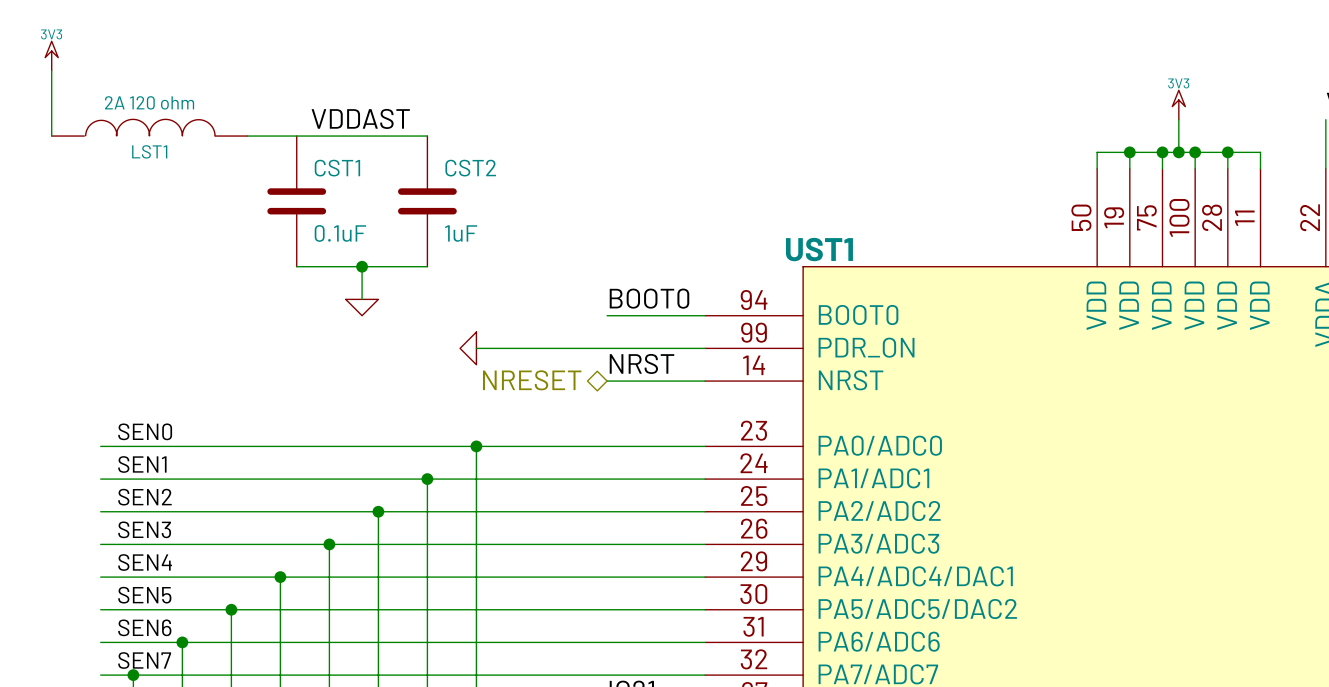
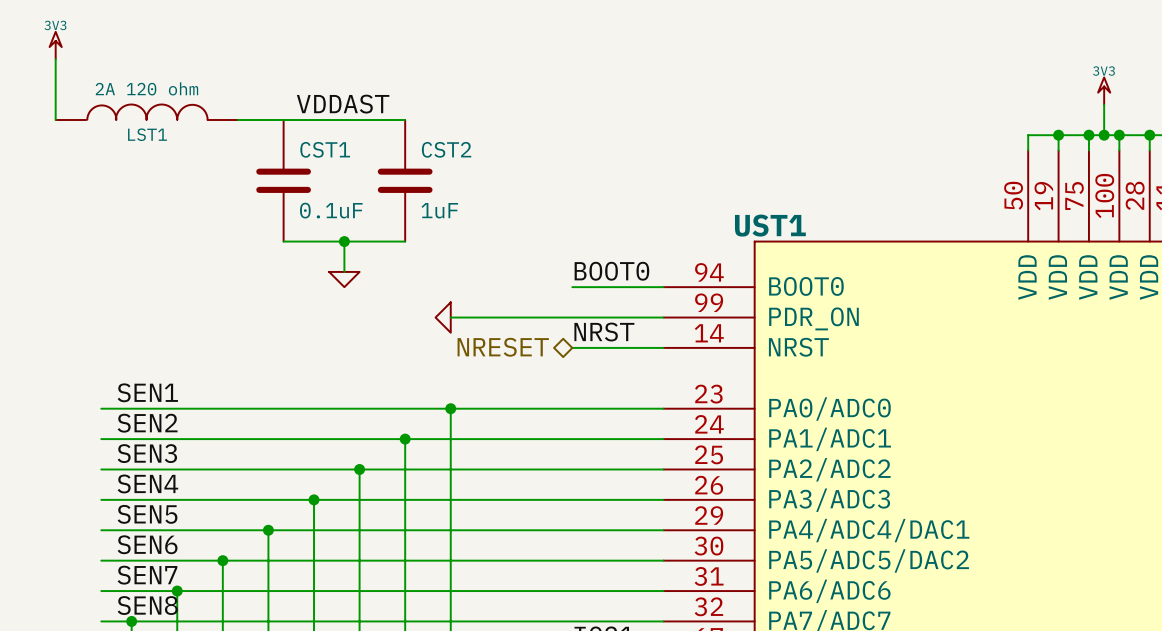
label: SEN0 (145, 431) -> SEN1 (147, 392)
label: SEN1 (142, 464) -> SEN2 (147, 423)
label: SEN2 (144, 497) -> SEN3 (147, 453)
label: SEN3 (144, 529) -> SEN4 (147, 483)
label: SEN4 (145, 562) -> SEN5 (147, 514)
label: SEN5 (144, 595) -> SEN6 (147, 544)
label: SEN6 (144, 627) -> SEN7 (147, 575)
label: SEN7 (144, 660) -> SEN8 (147, 605)

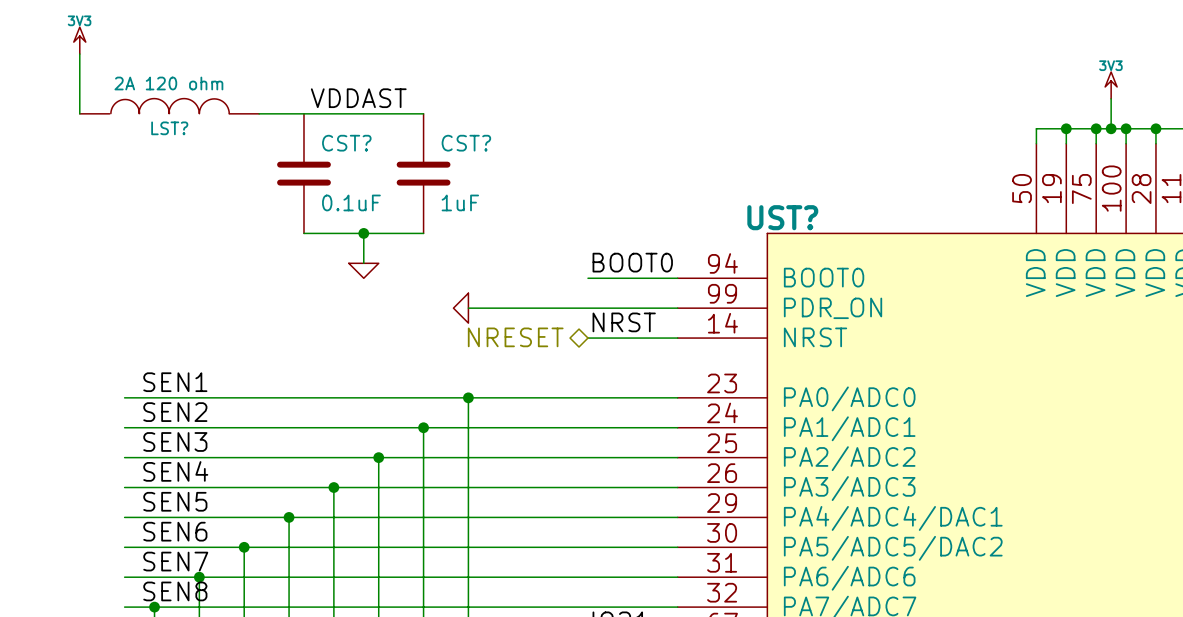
LST1 name: LST1 (147, 134) -> LST? (169, 128)
CST1 name: CST1 (325, 149) -> CST? (346, 143)
CST2 name: CST2 (446, 149) -> CST? (466, 143)
UST1 name: UST1 (770, 225) -> UST? (782, 217)

